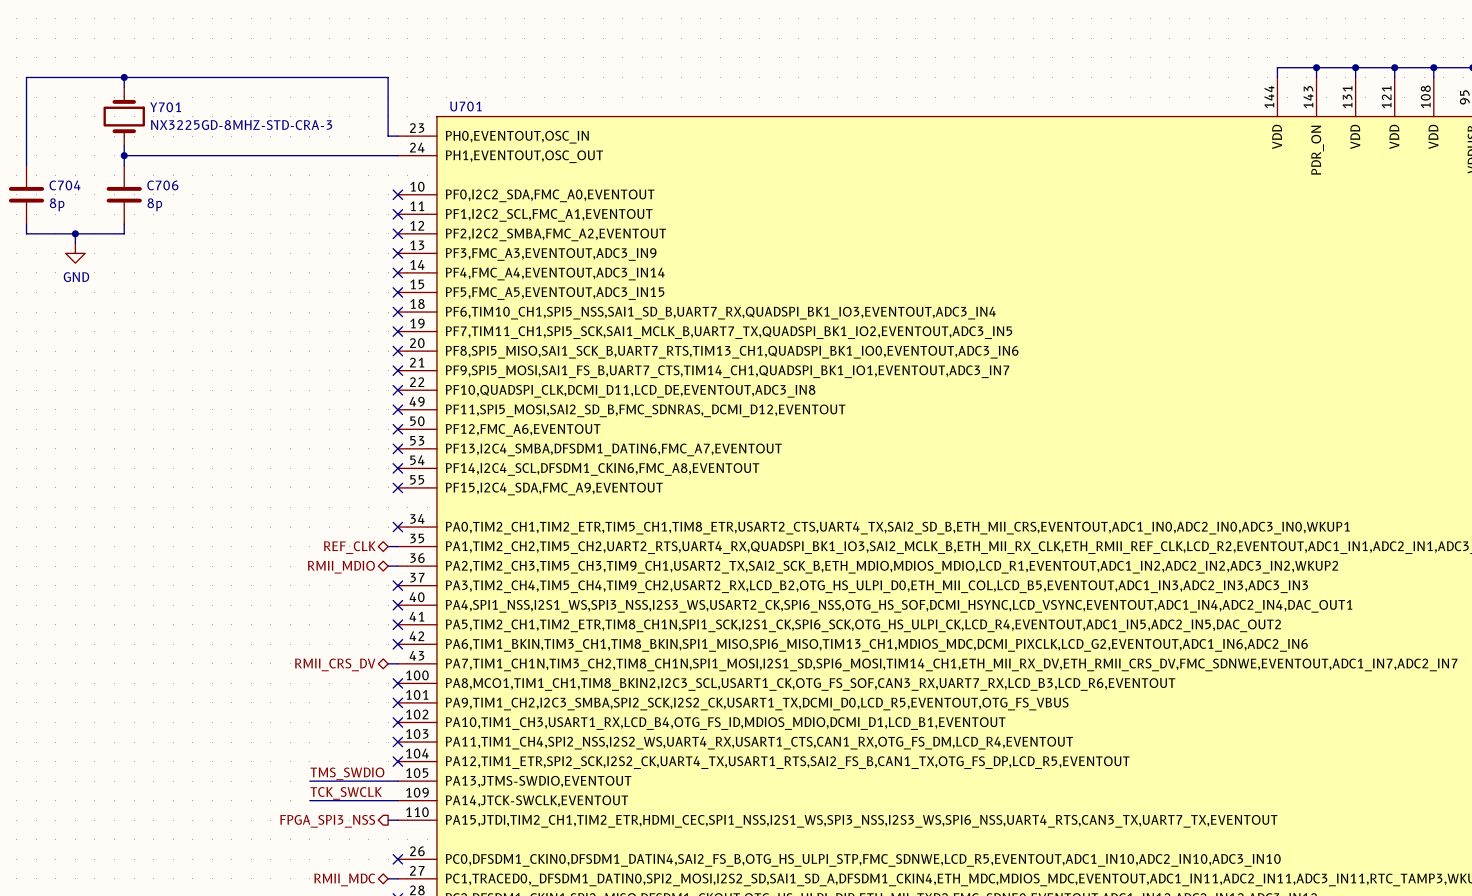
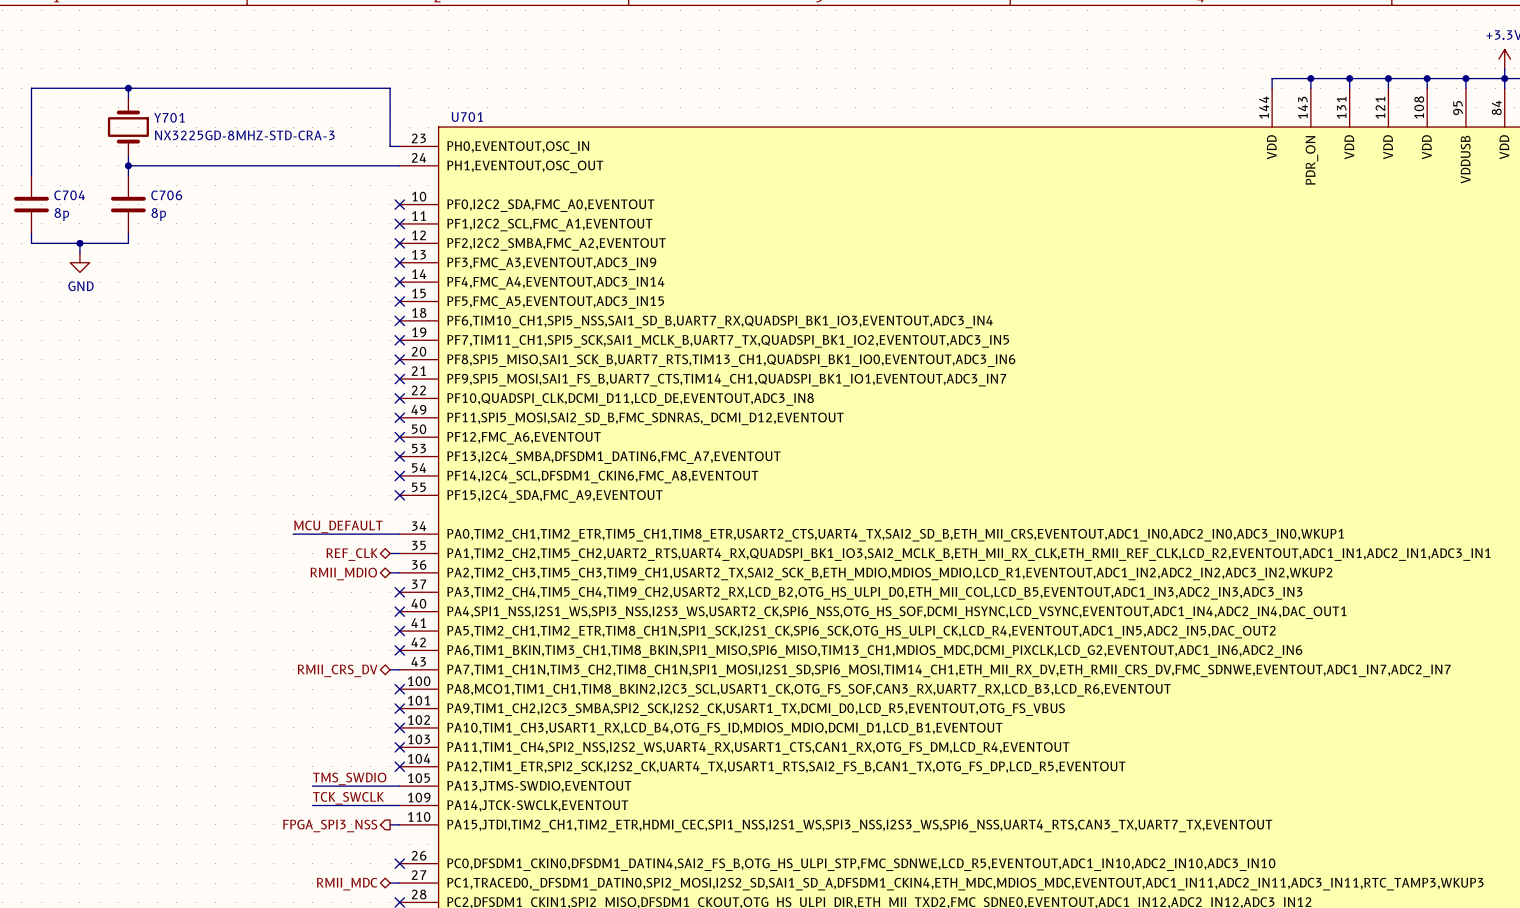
label: none -> MCU_DEFAULT (338, 526)
wire: none -> (293, 534) (399, 534)
no-connect mark: (397, 527) -> none

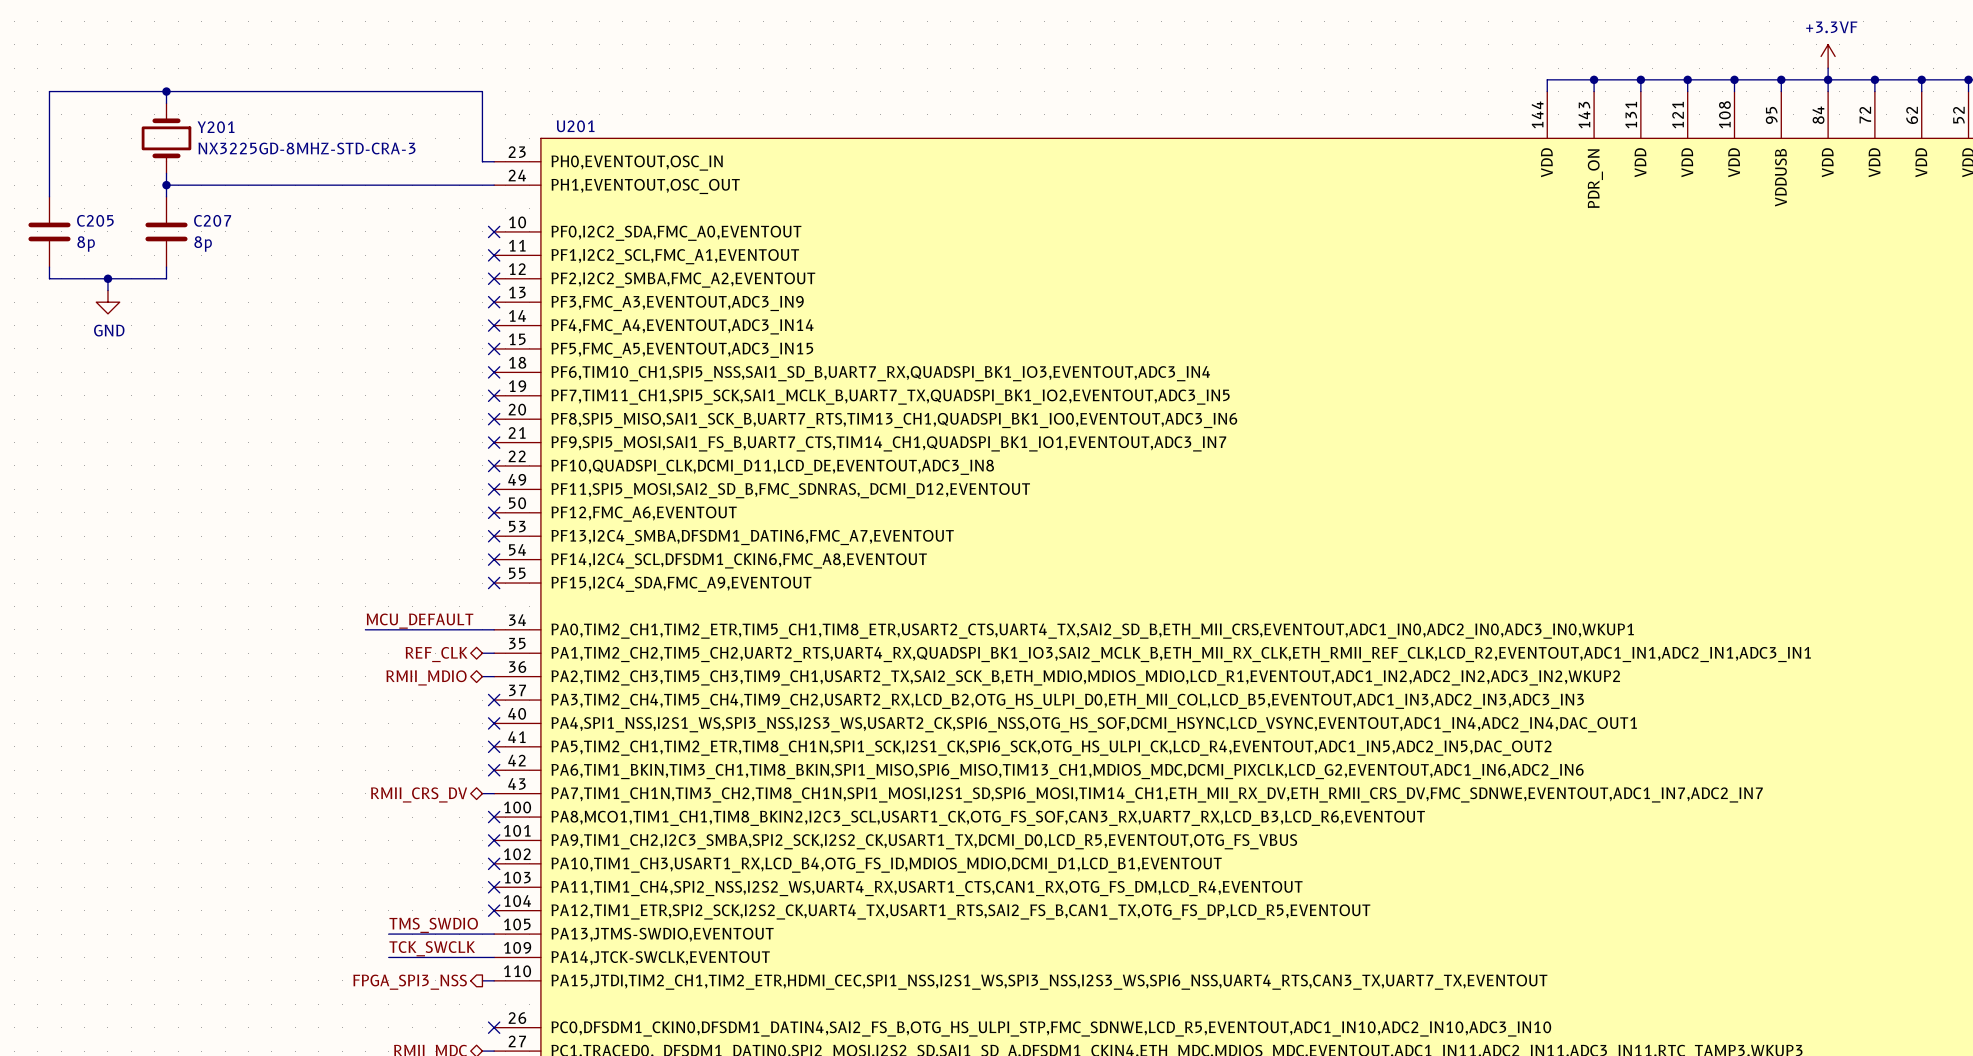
Y701 name: Y701 (169, 117) -> Y201 (216, 127)
U701 name: U701 (467, 117) -> U201 (575, 126)
C704 name: C704 (69, 195) -> C205 (95, 220)
C706 name: C706 (166, 195) -> C207 (212, 220)

